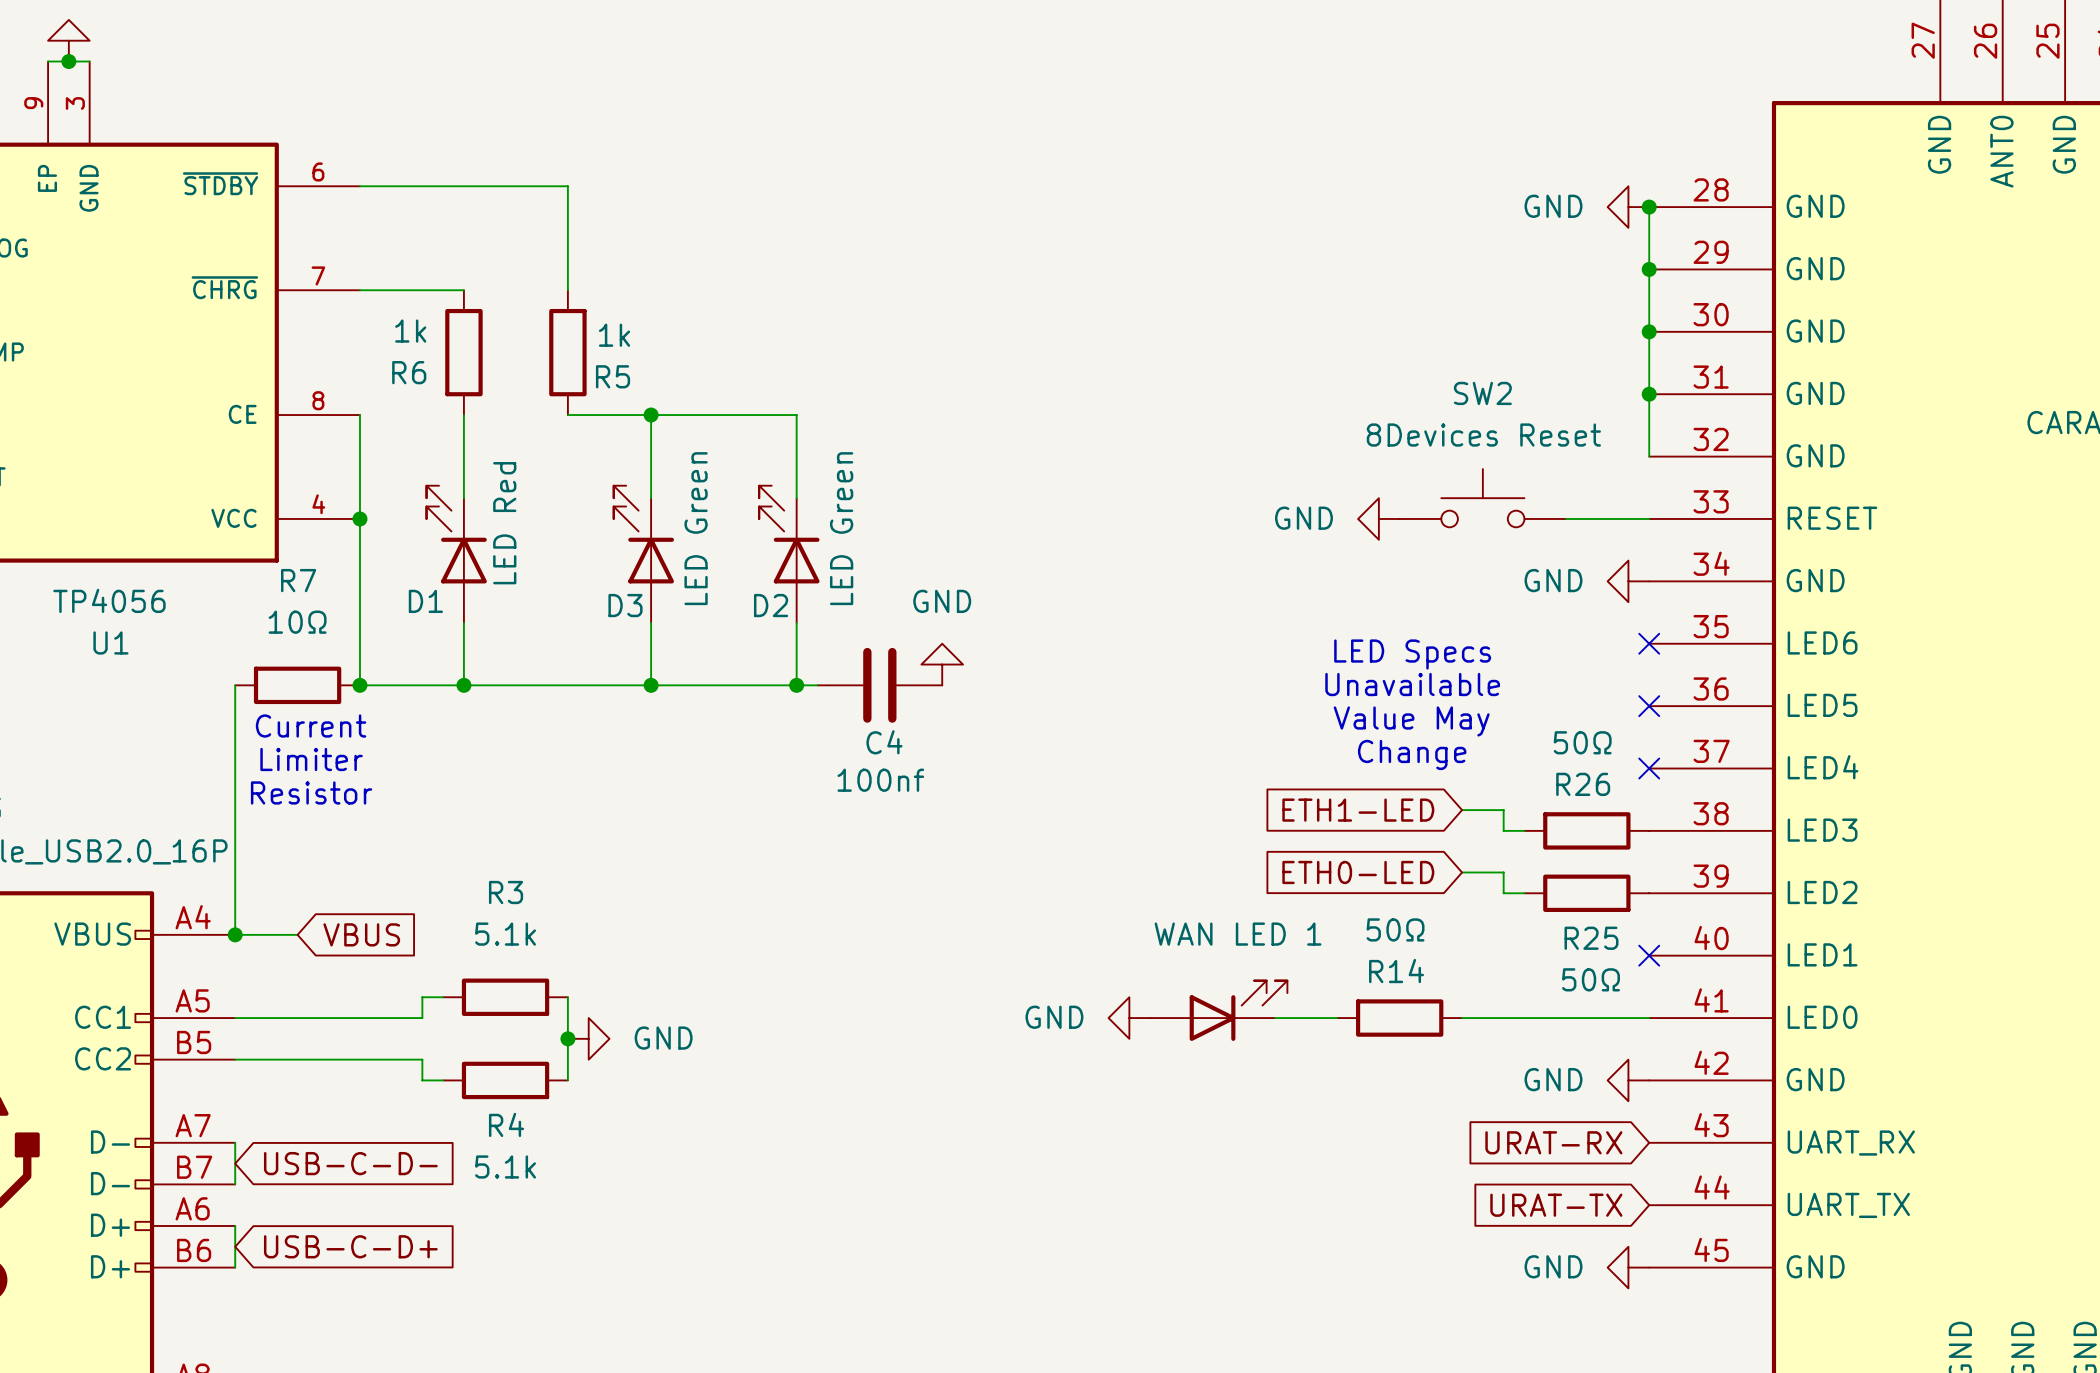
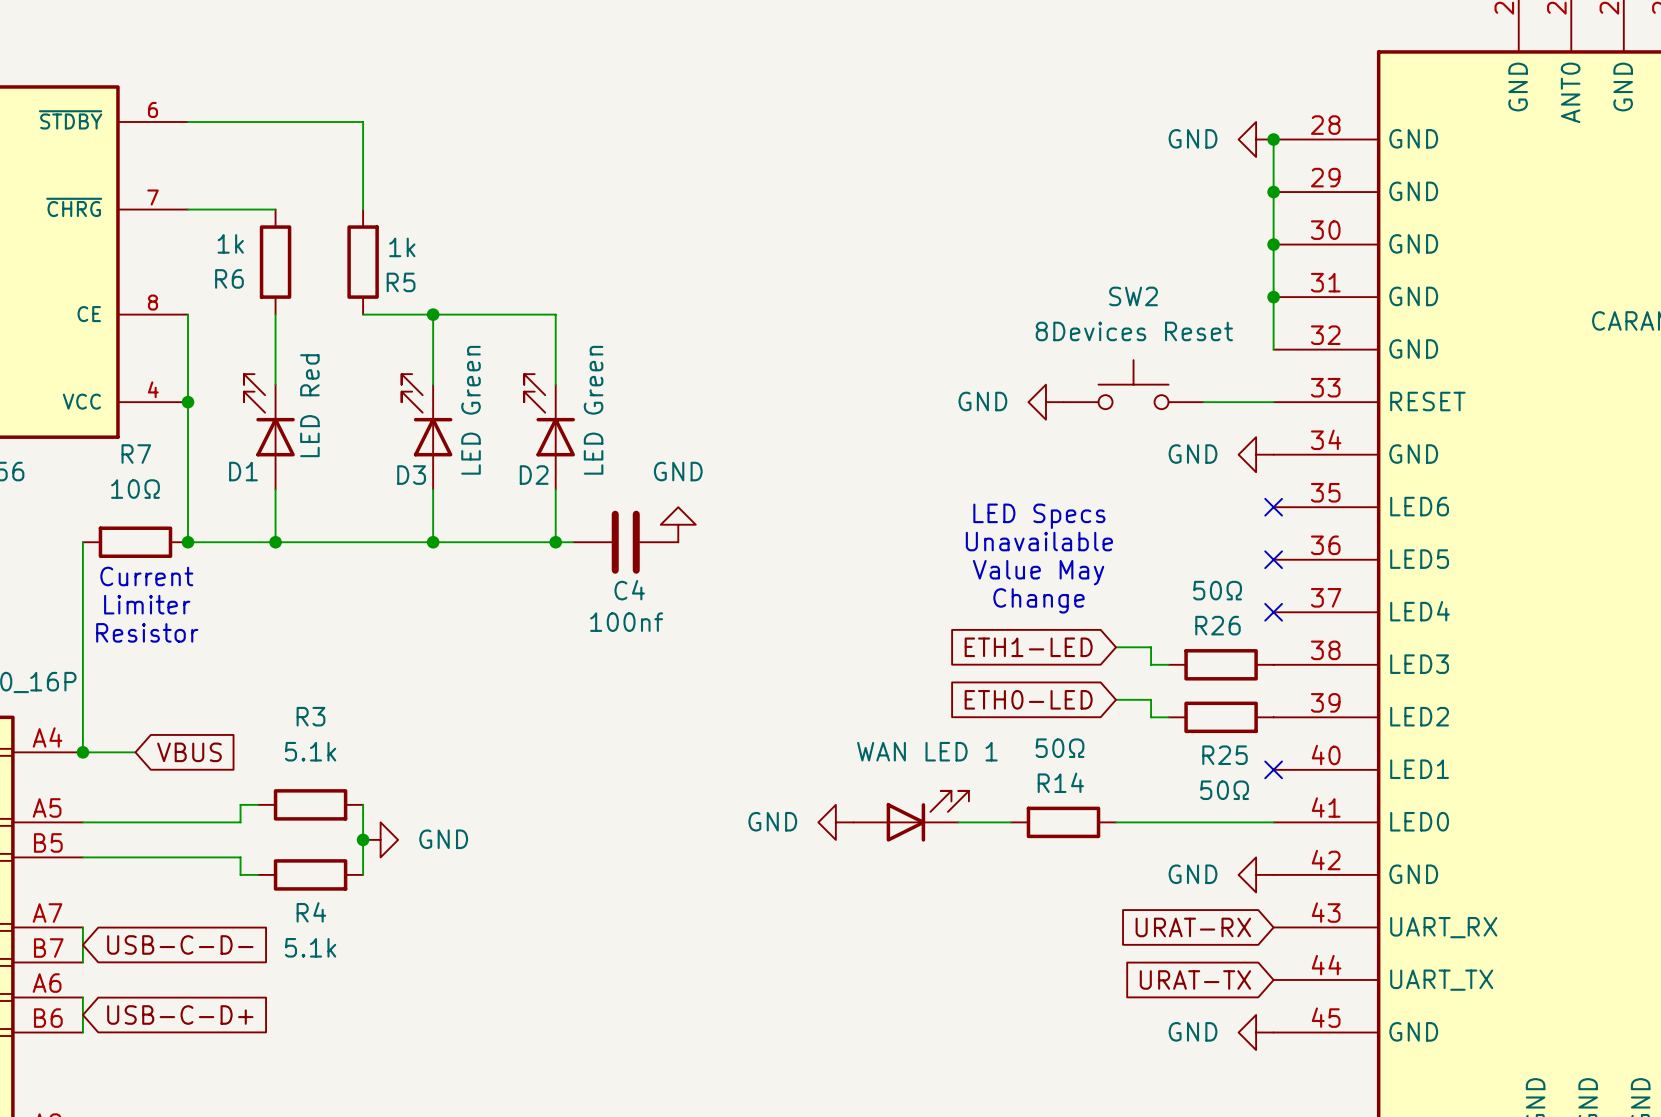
text position: LED Specs (1412, 654) -> LED Specs (1039, 516)
text position: Unavailable (1412, 684) -> Unavailable (1039, 541)
text position: Value May (1411, 721) -> Value May (1038, 572)
text position: Change (1412, 754) -> Change (1038, 600)

